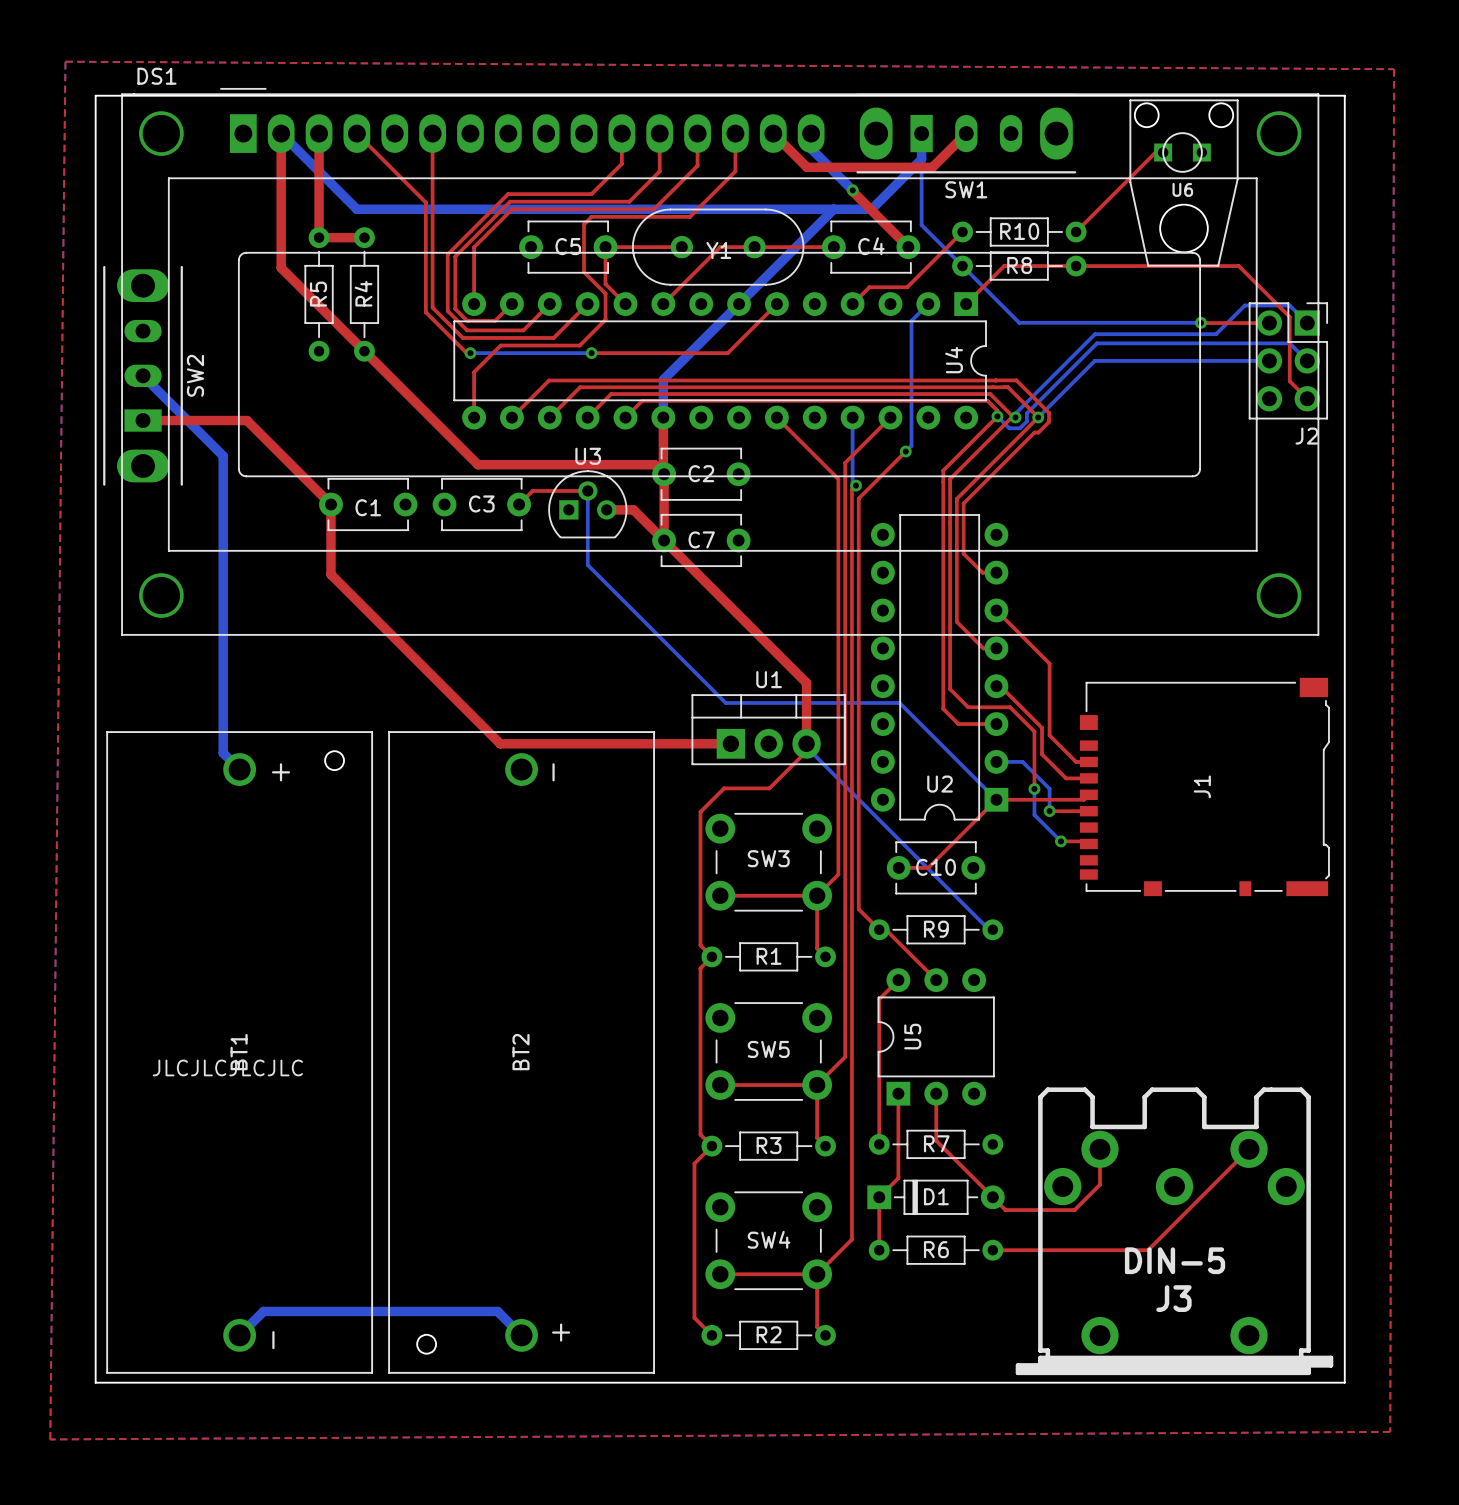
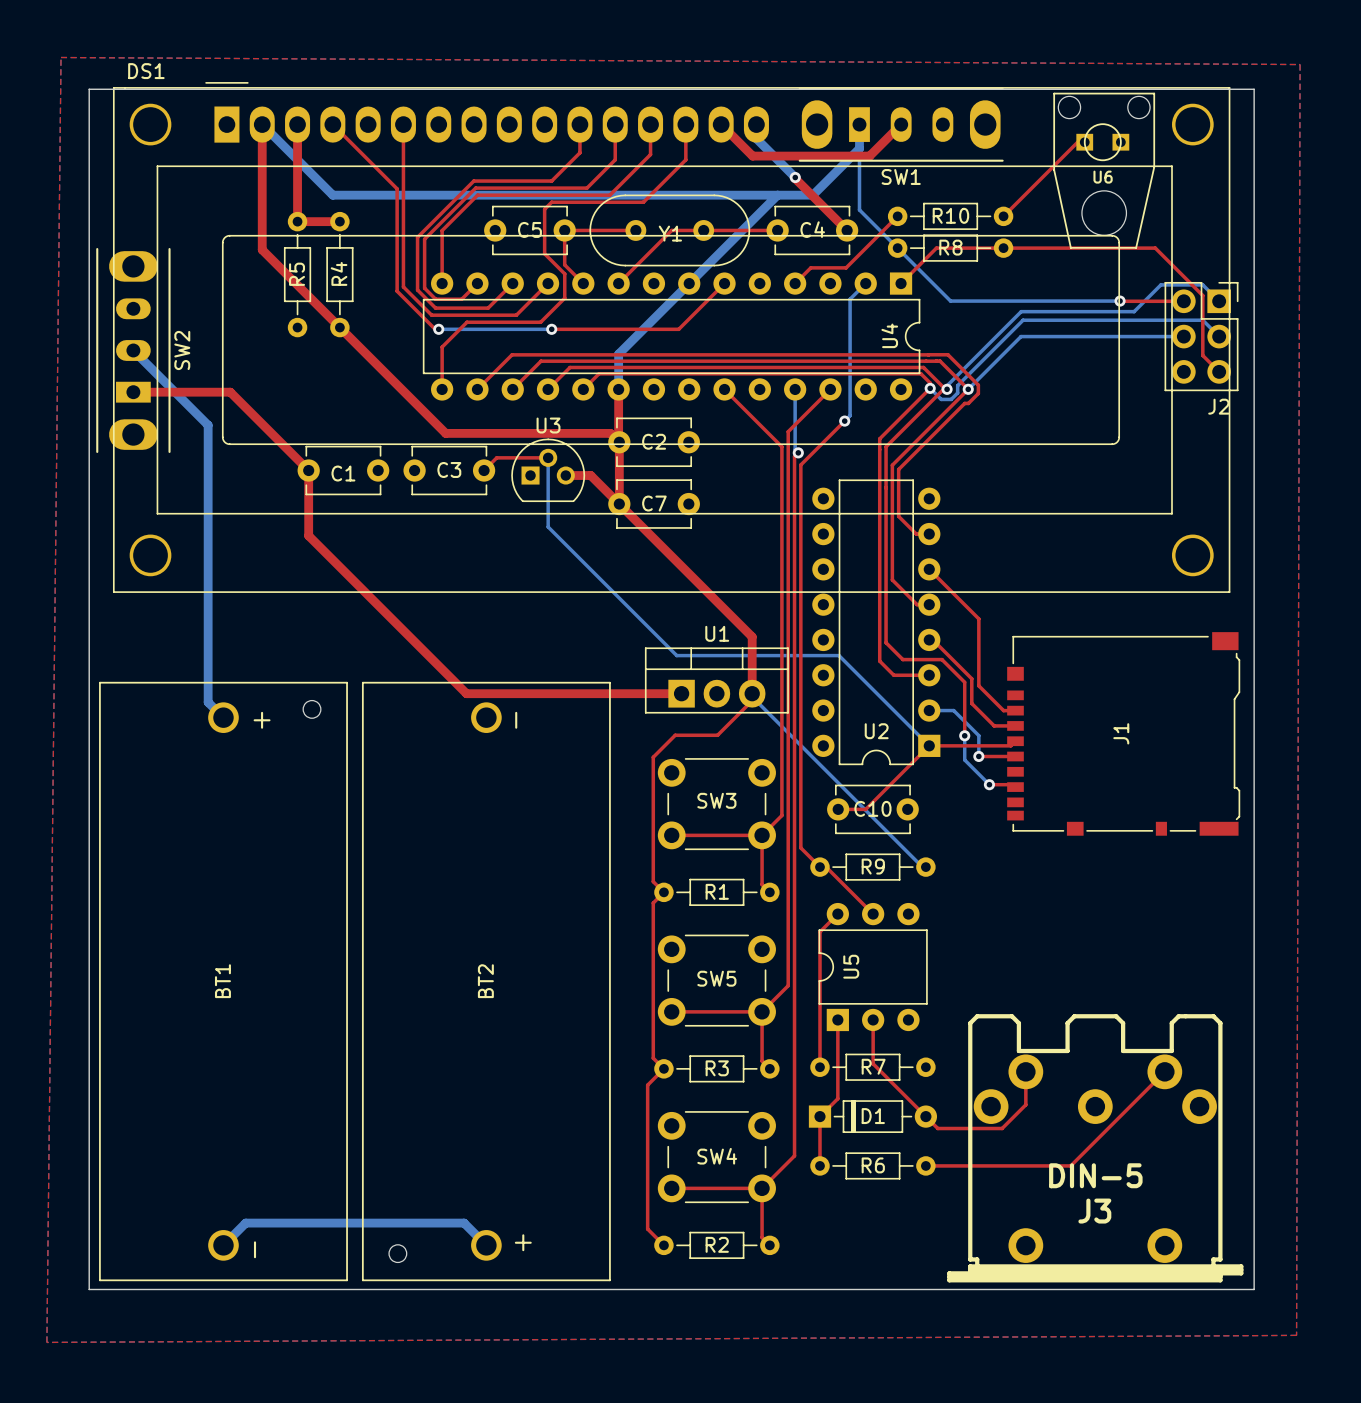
text: JLCJLCJLCJLC (227, 1067) -> none

